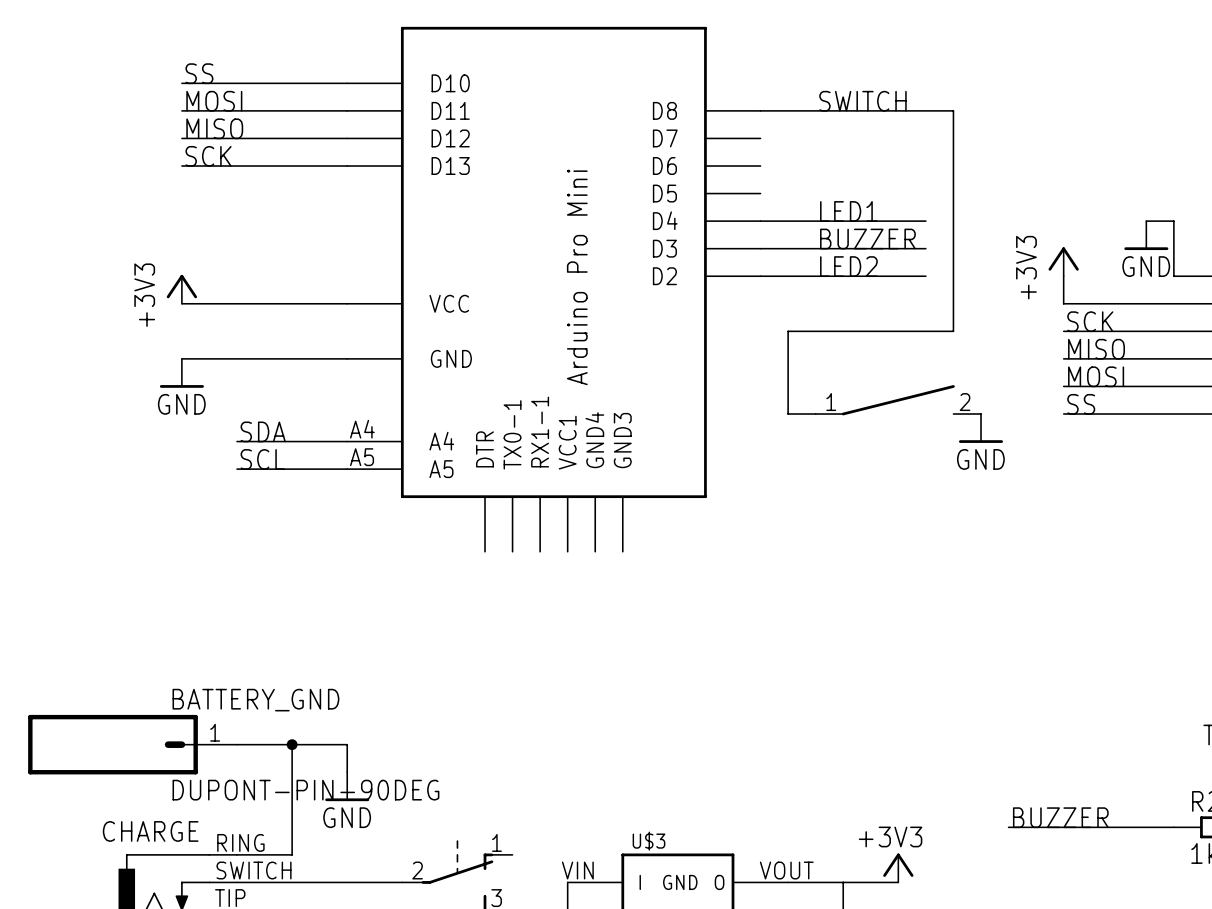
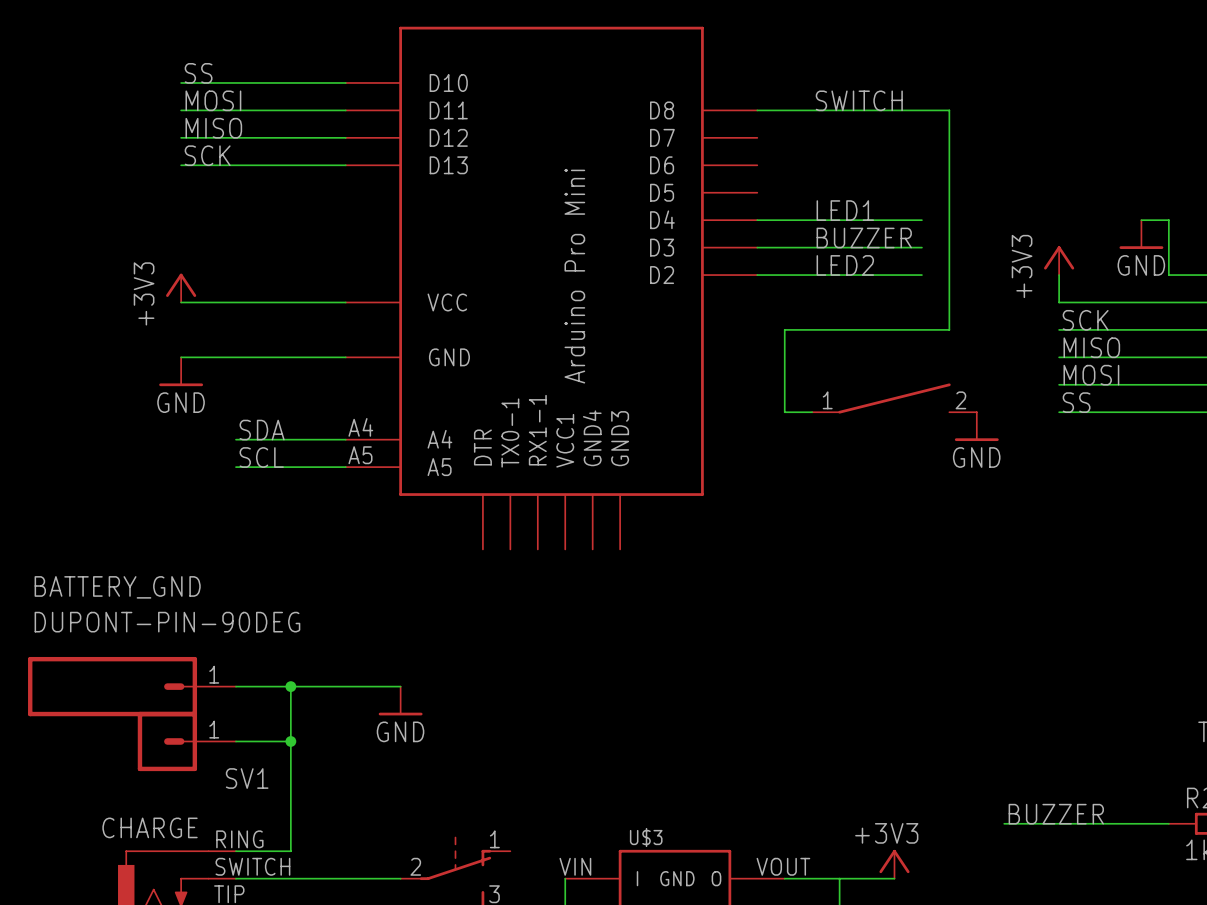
wire: none -> (235, 686) (400, 686)
junction: none -> (290, 686)
BATTERY_GND name position: BATTERY_GND (255, 700) -> BATTERY_GND (117, 587)
BATTERY_GND position: (132, 744) -> (132, 686)
SV1: none -> (186, 741)
wire: (292, 744) (347, 744) (347, 772) -> (290, 741) (290, 686)
power symbol position: GND (347, 786) -> GND (400, 701)
BATTERY_GND value position: DUPONT-PIN-90DEG (305, 790) -> DUPONT-PIN-90DEG (167, 622)

